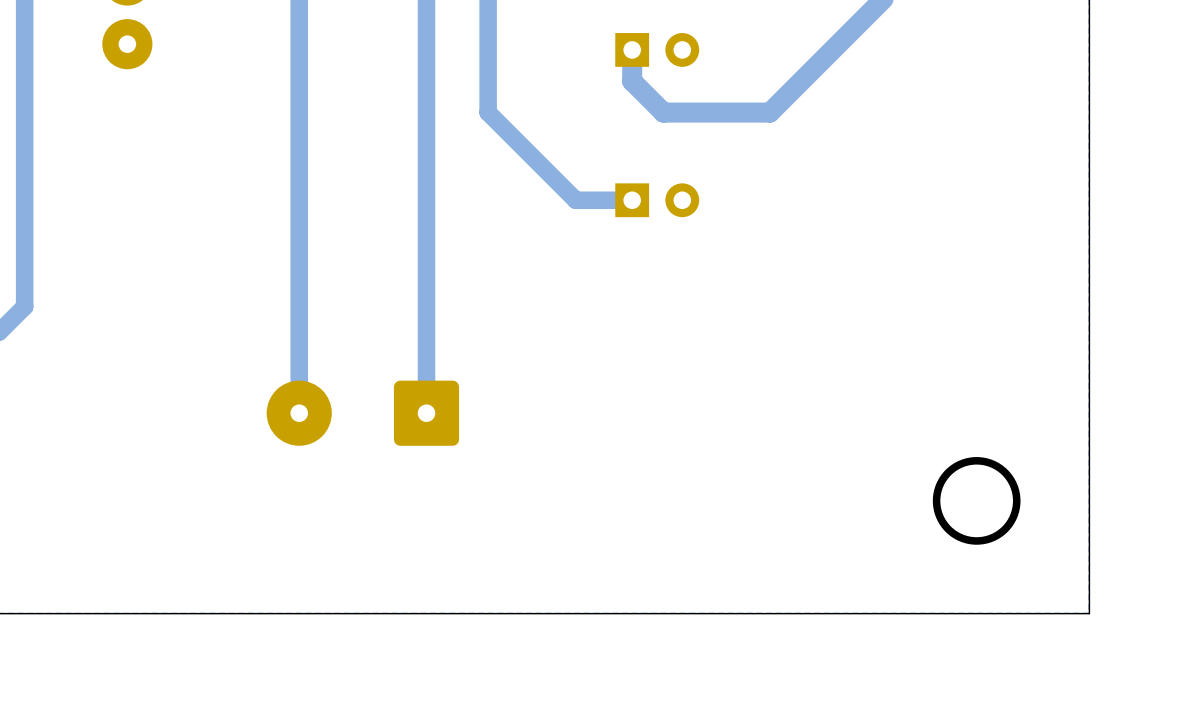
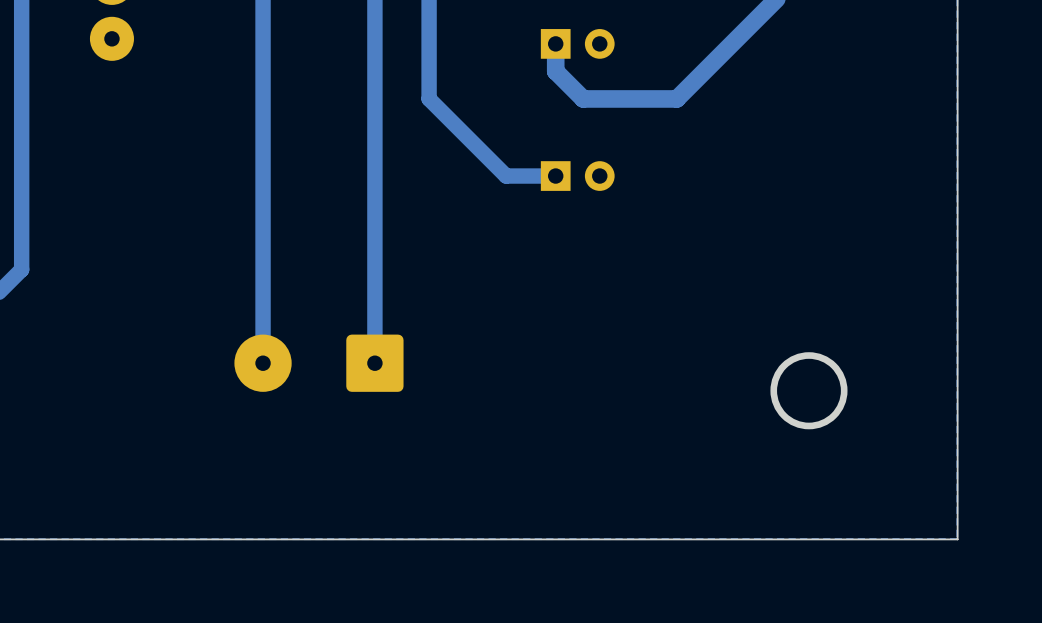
round board edge position: (976, 500) -> (808, 390)

